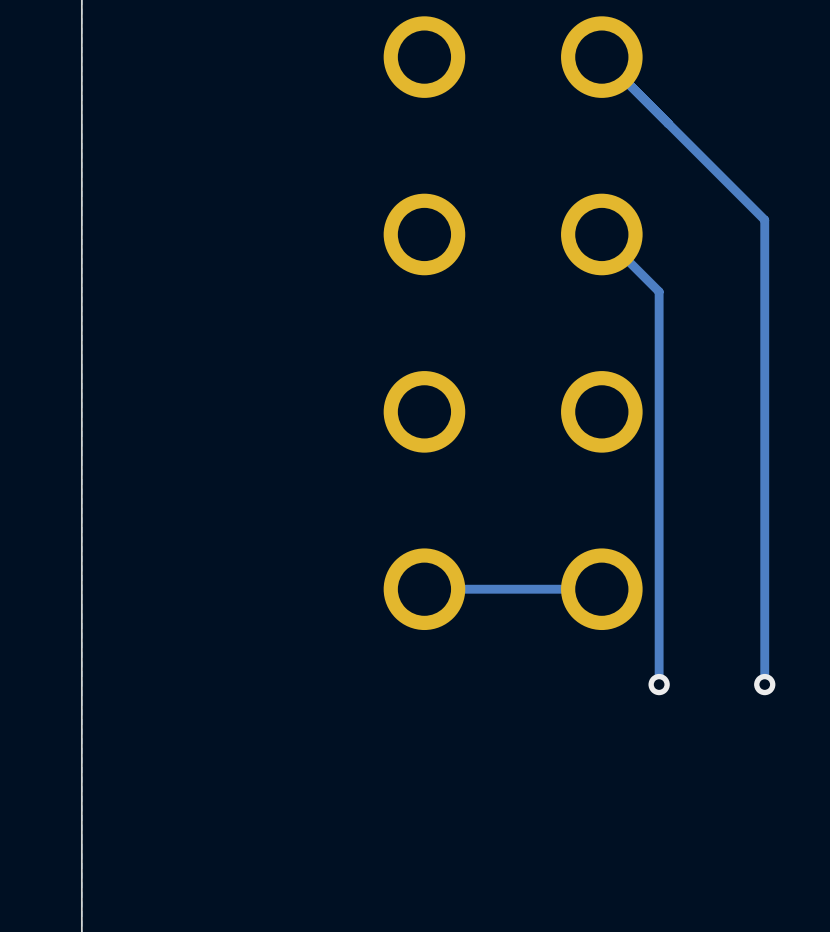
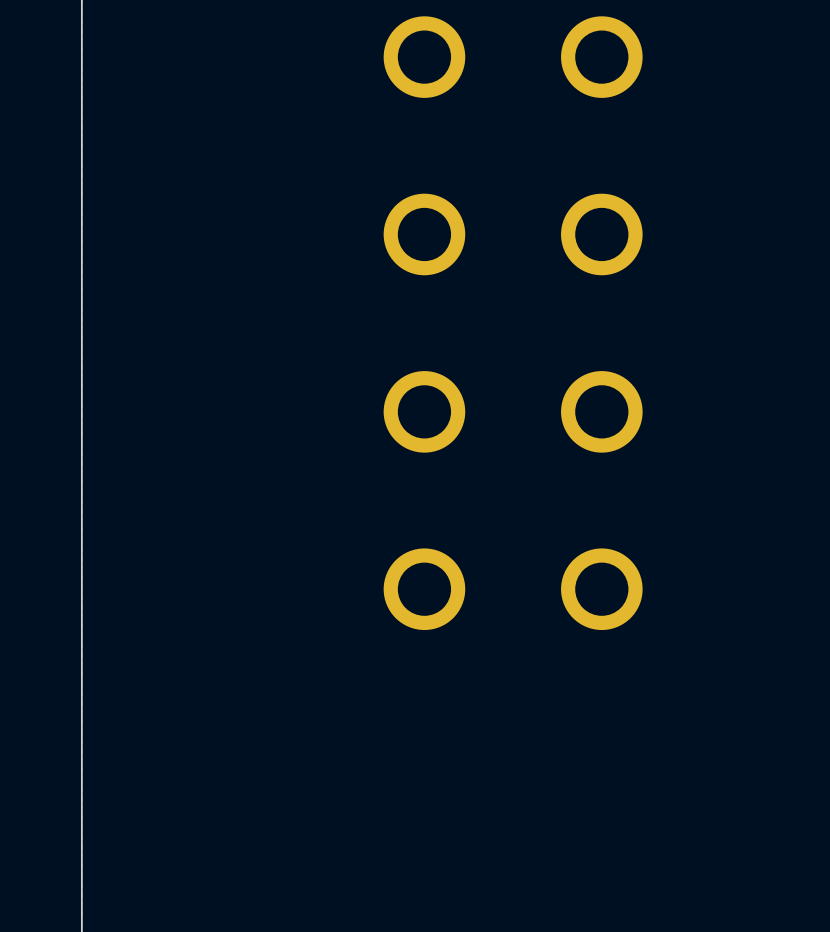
track: (668, 123) (601, 57) (668, 123) -> none
track: (668, 123) (764, 220) (764, 684) -> none
track: (601, 234) (659, 291) (659, 684) -> none
track: (601, 589) (424, 589) -> none
via: (659, 684) -> none
via: (764, 684) -> none

